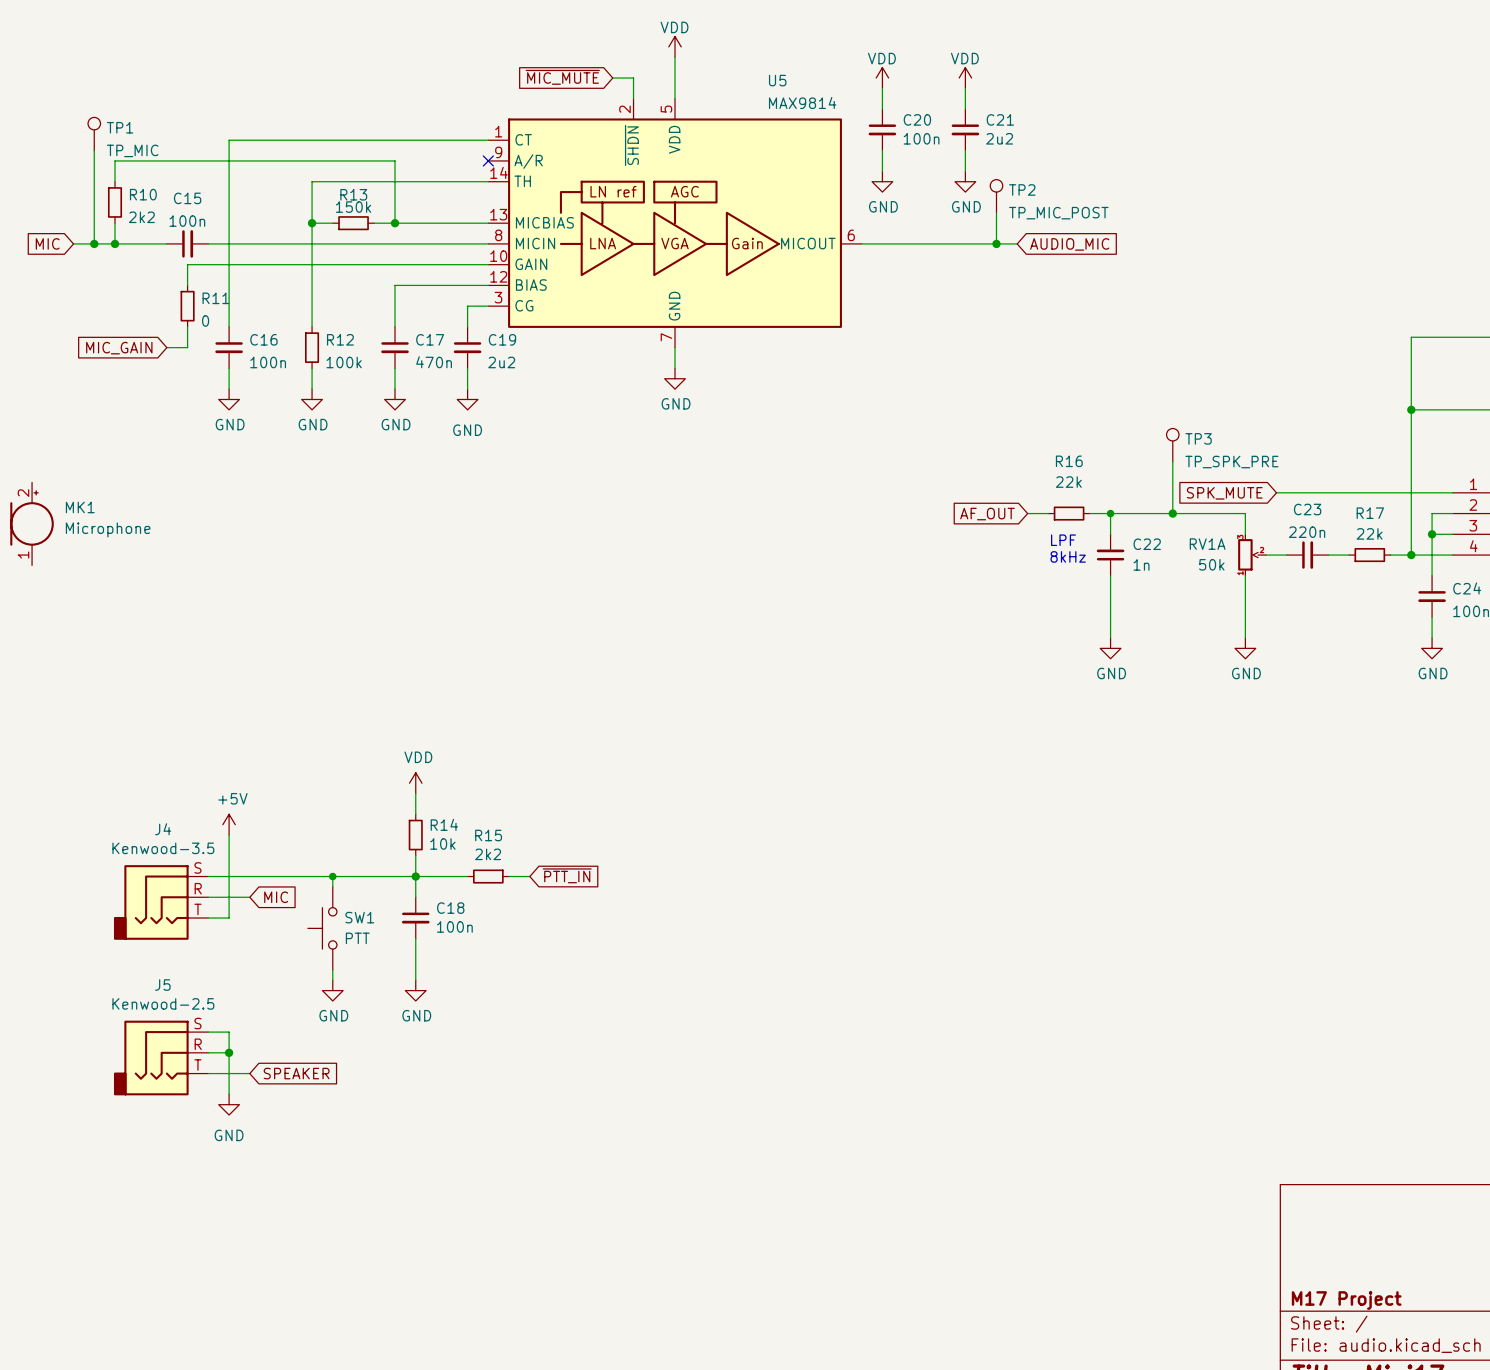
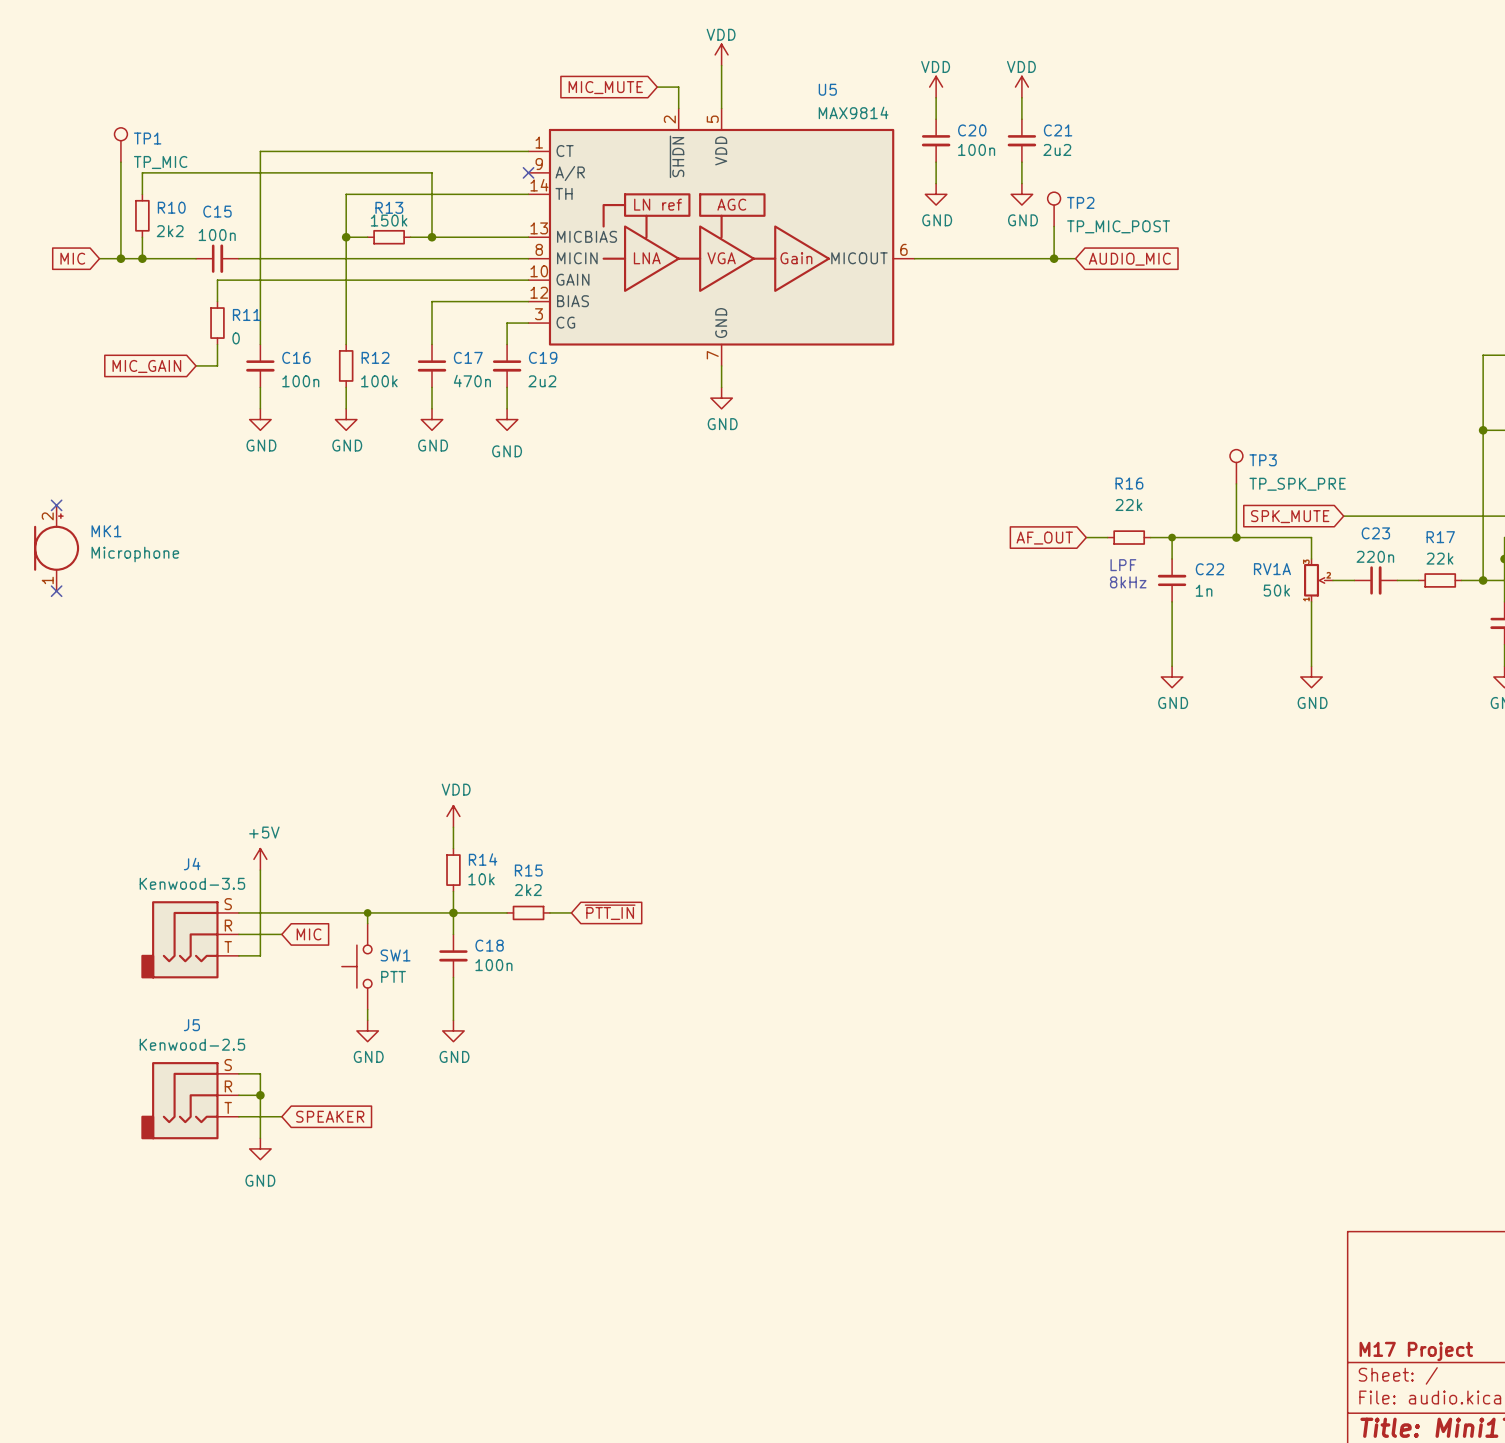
global label: ~{MIC_MUTE} (562, 77) -> MIC_MUTE (605, 87)
no-connect mark: none -> (56, 505)
no-connect mark: none -> (56, 591)

